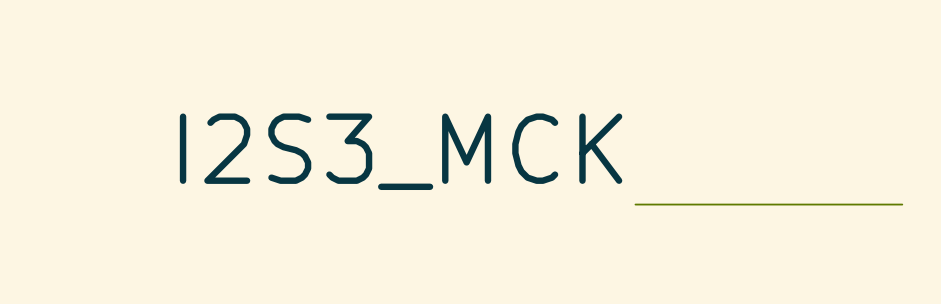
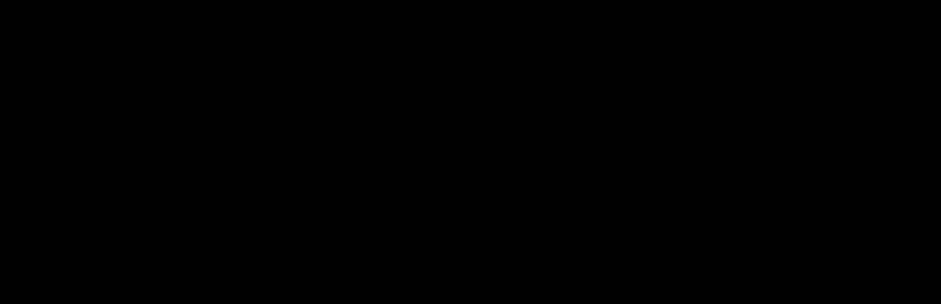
label: I2S3_MCK (401, 151) -> none
wire: (635, 204) (902, 204) -> none

